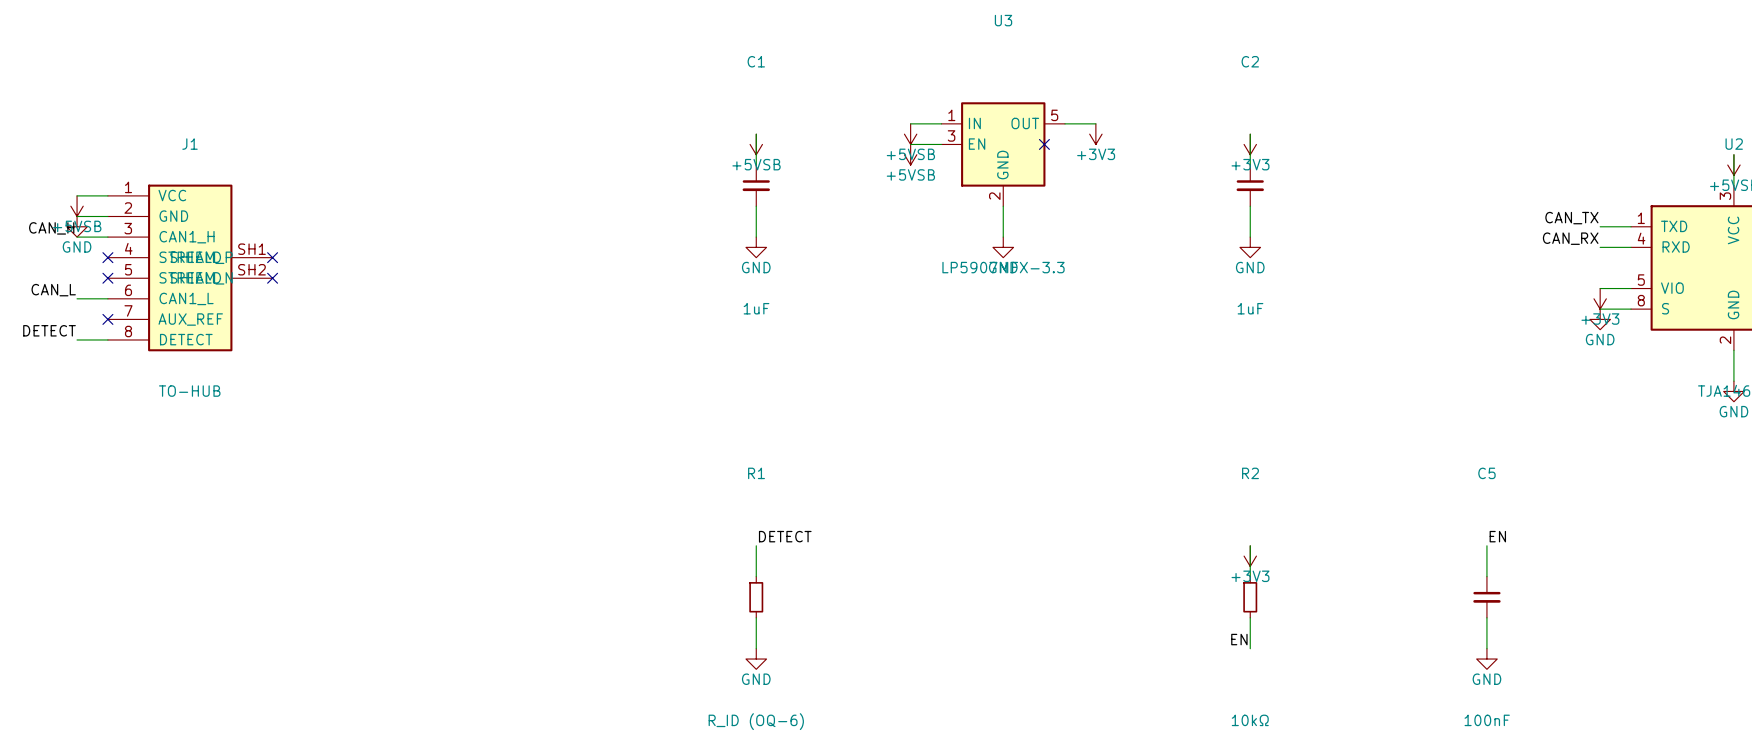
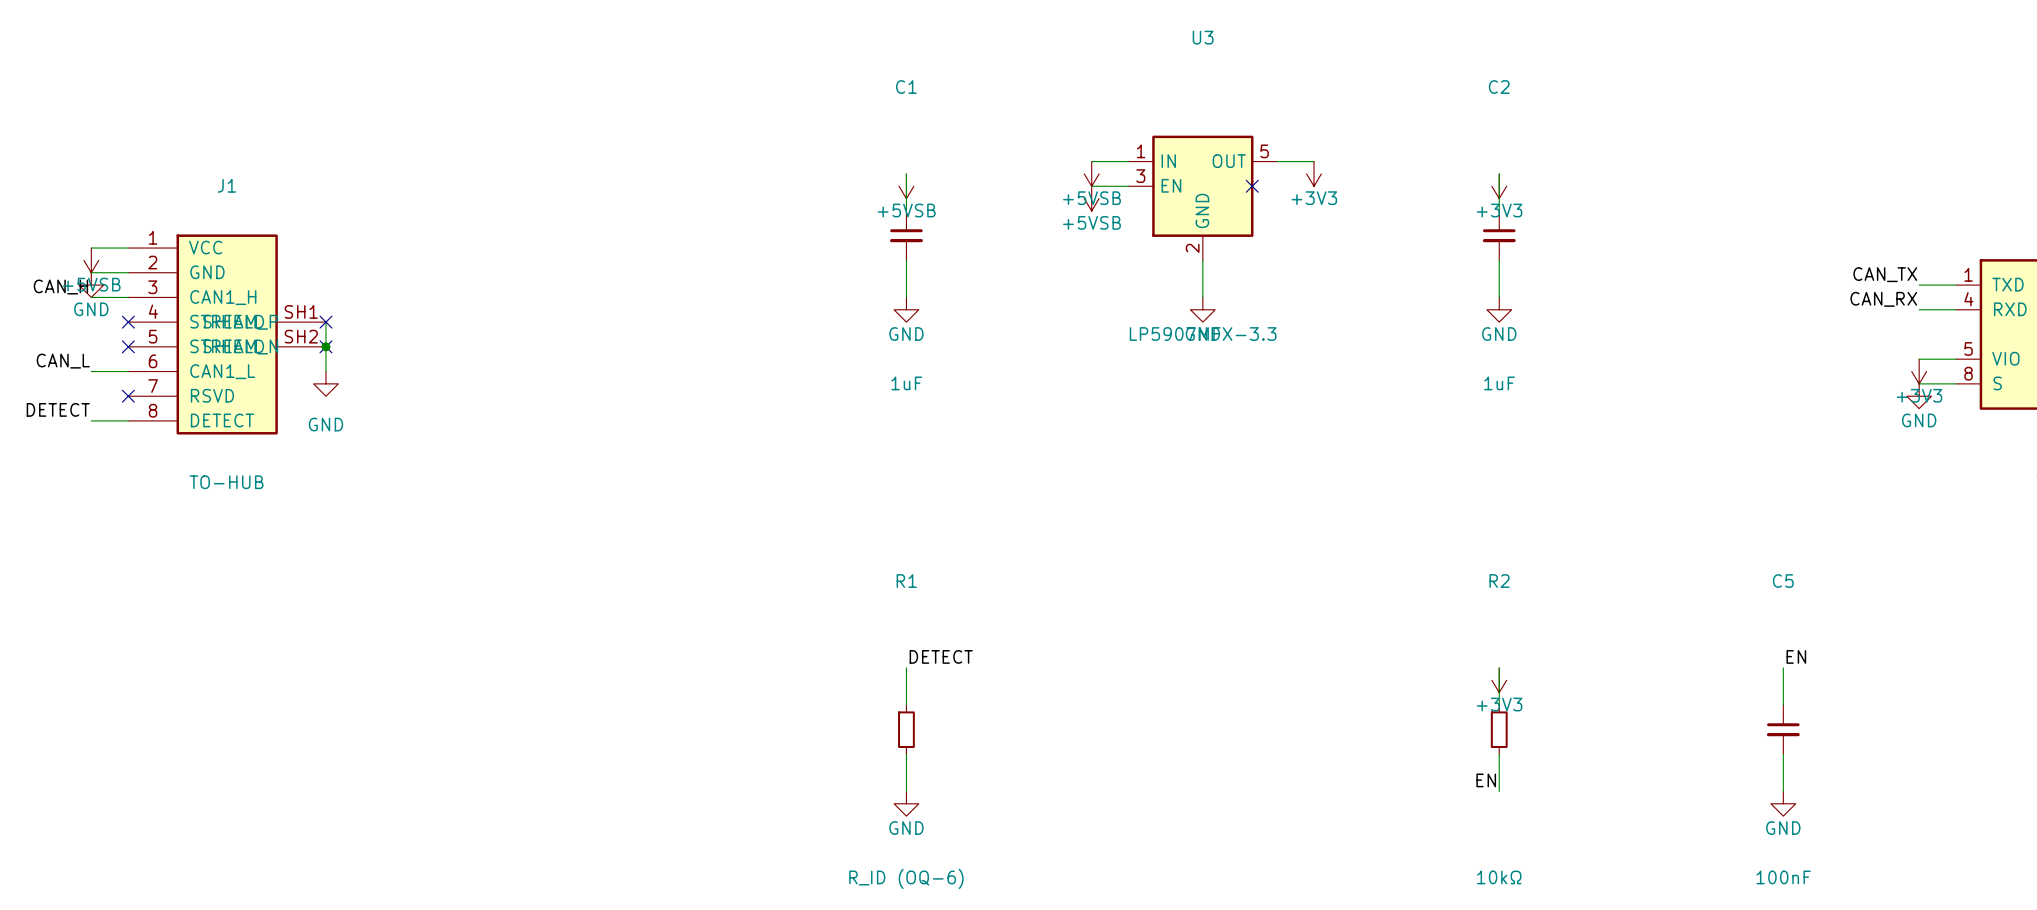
wire: none -> (325, 322) (325, 371)
junction: none -> (325, 346)
power symbol: none -> GND (325, 383)
J1 pin name: AUX_REF (190, 319) -> RSVD (212, 395)

